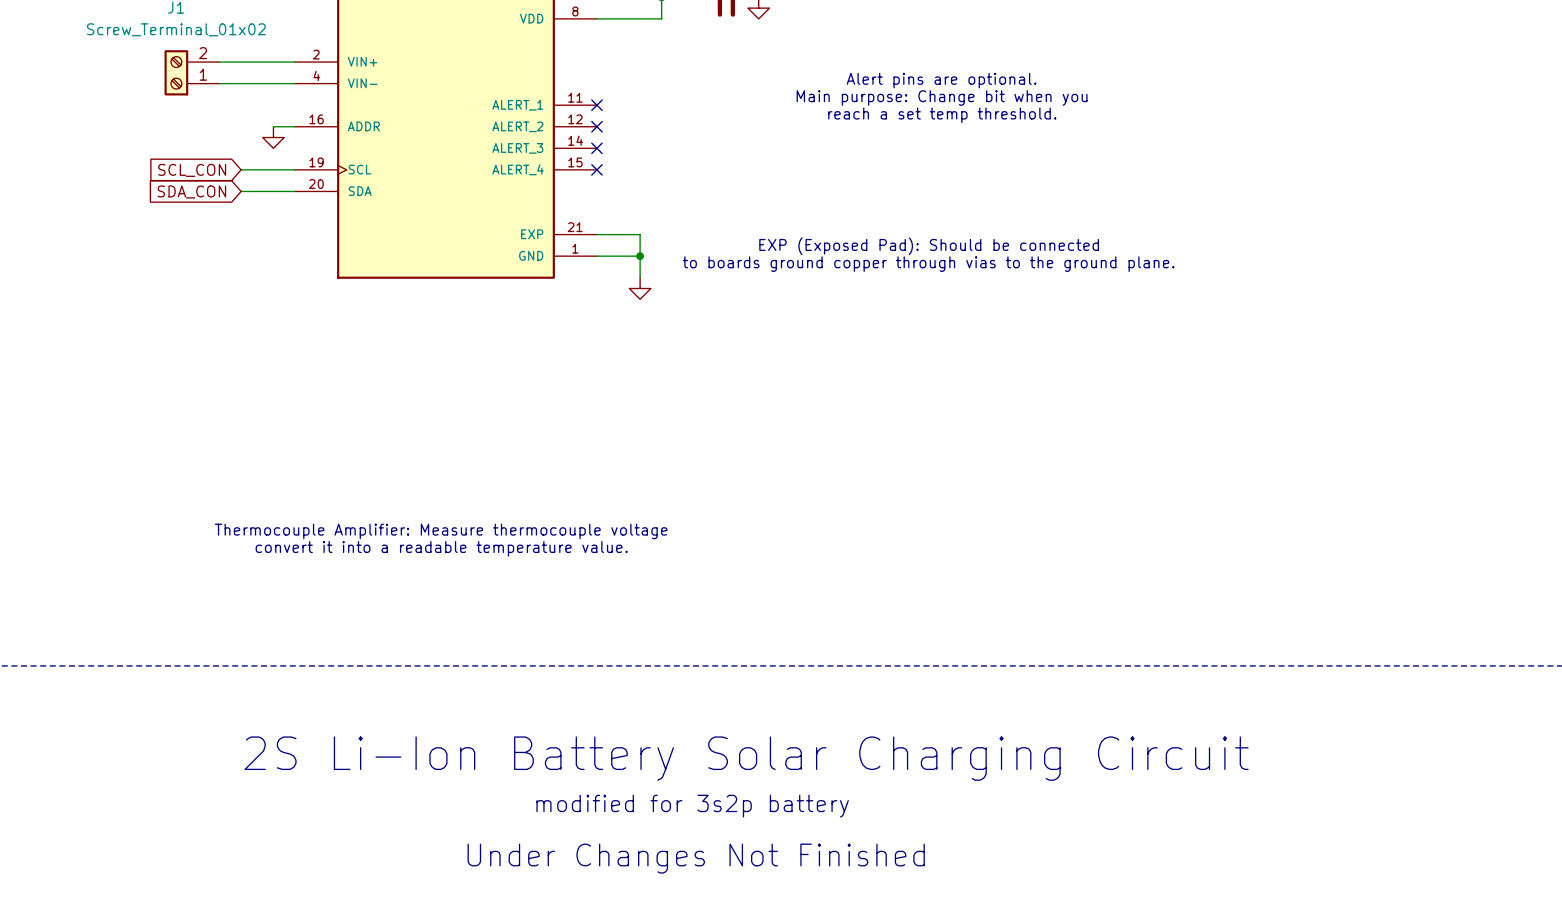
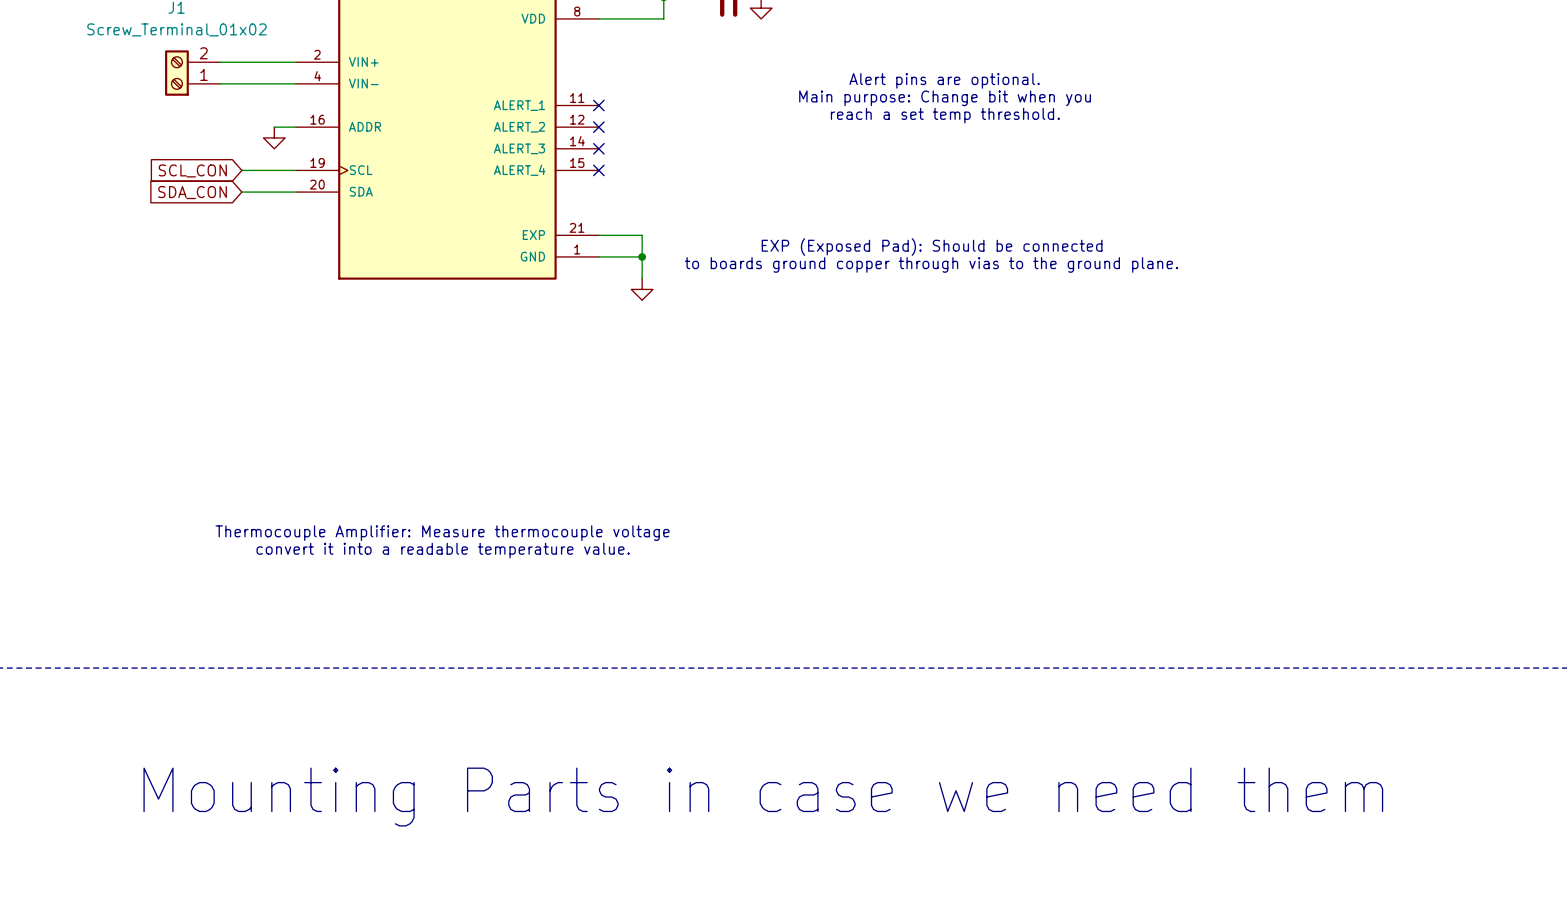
text: 2S Li-Ion Battery Solar Charging Circuit (746, 758) -> none
text: none -> Mounting Parts in case we need them (763, 797)
text: modified for 3s2p battery (692, 806) -> none
text: Under Changes Not Finished (696, 858) -> none

